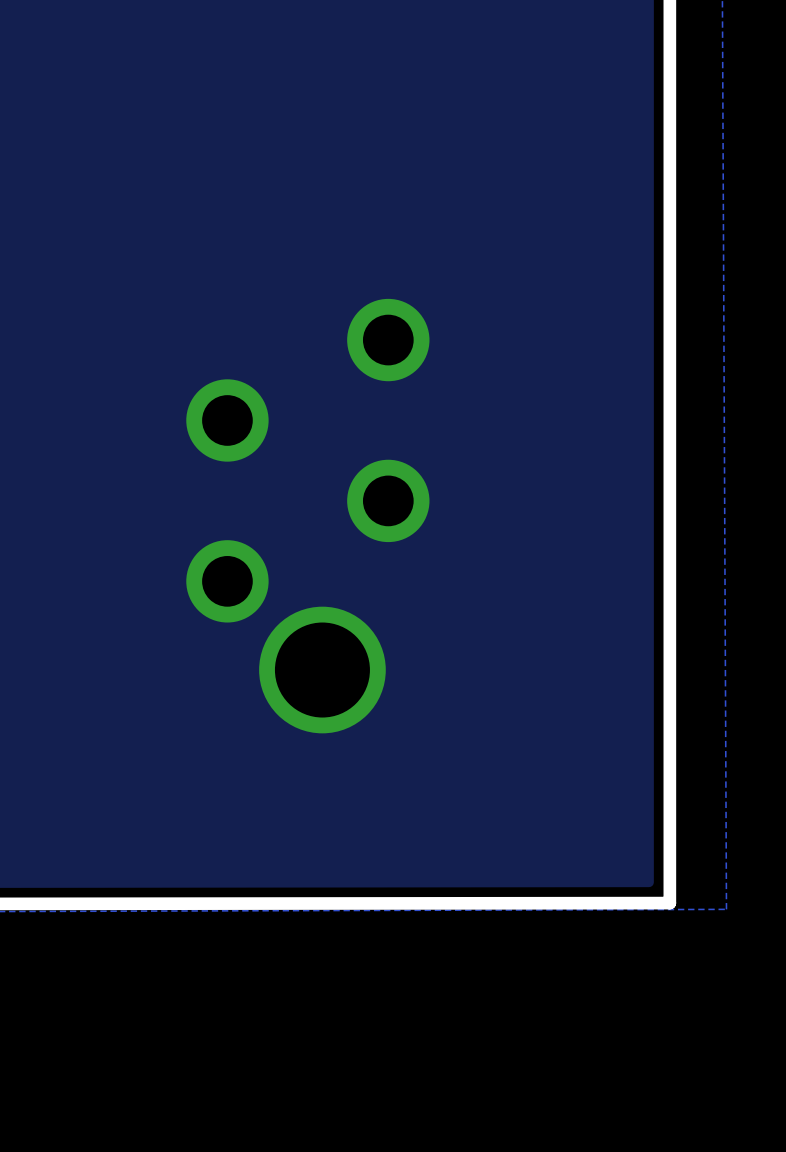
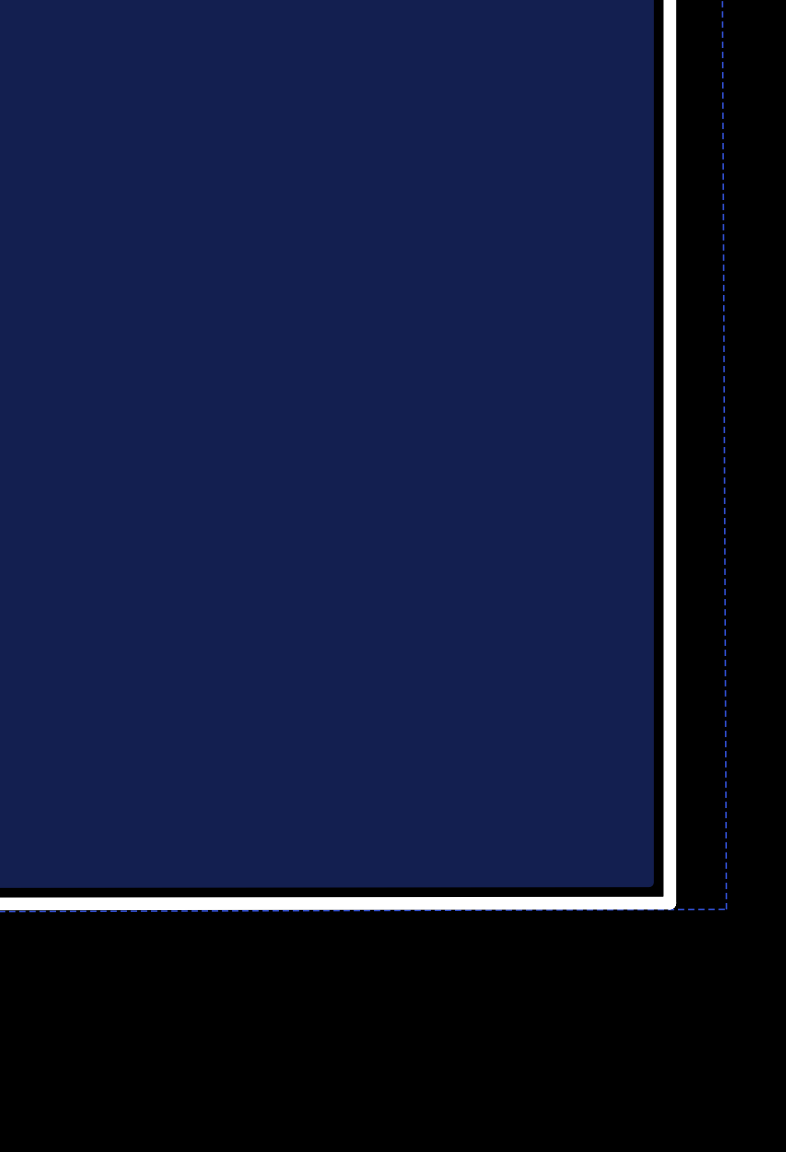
part: (307, 516) -> none

